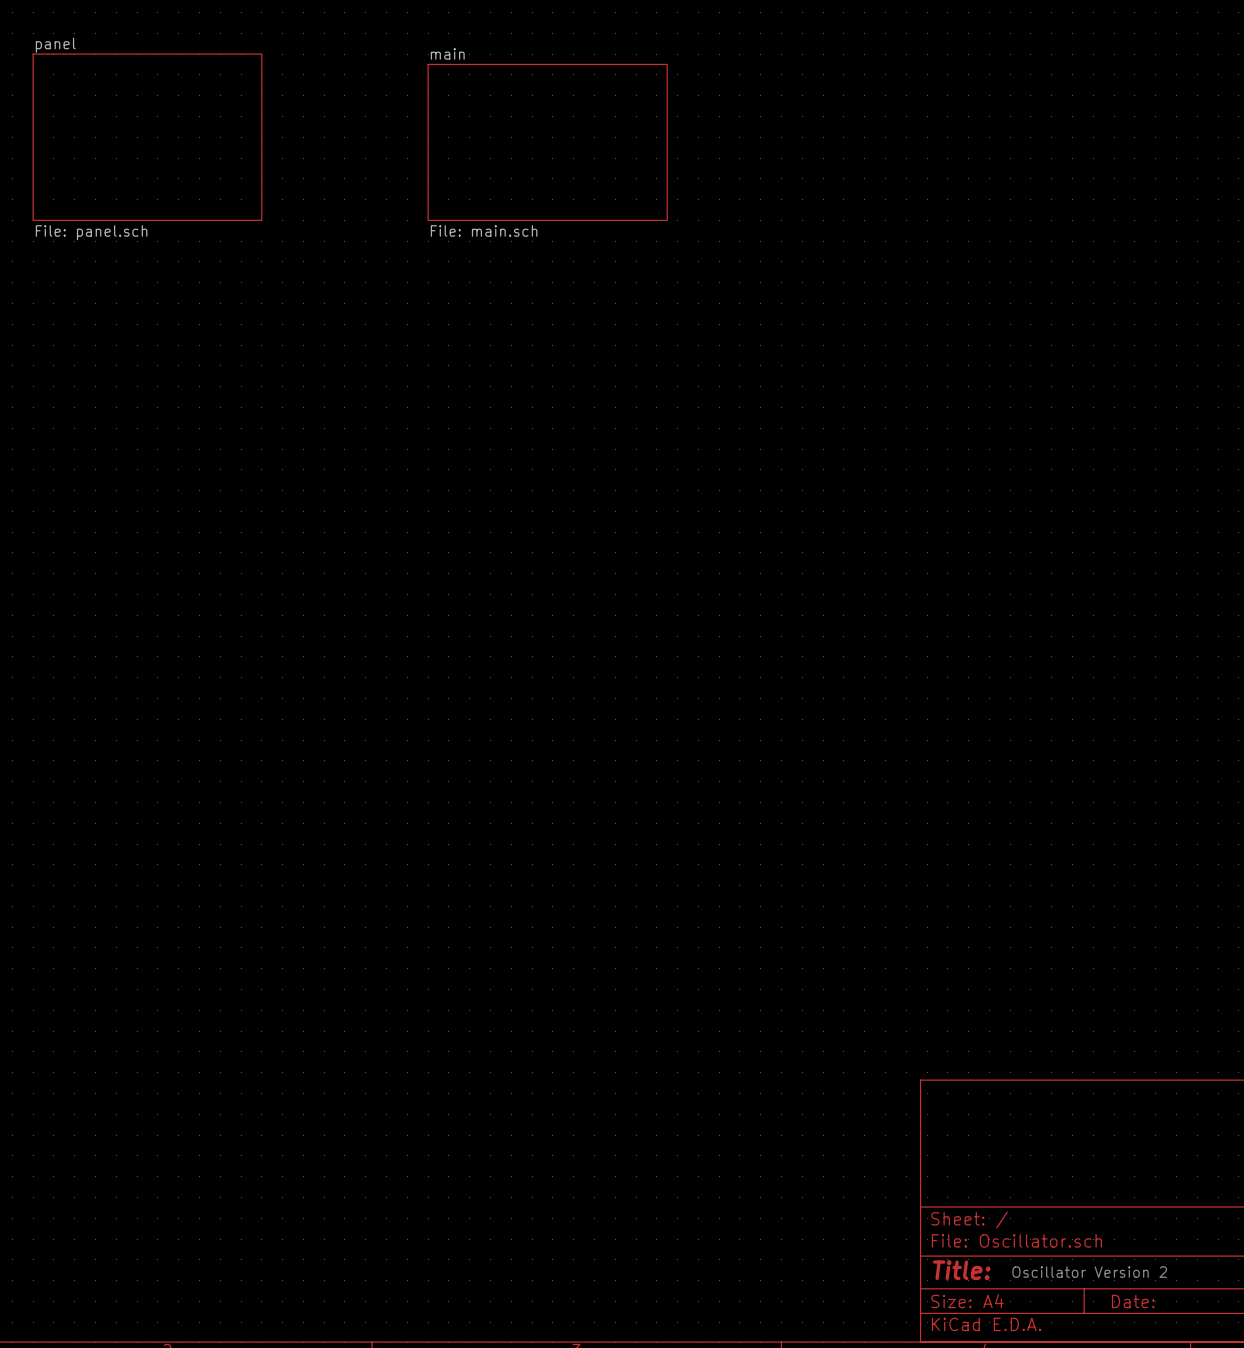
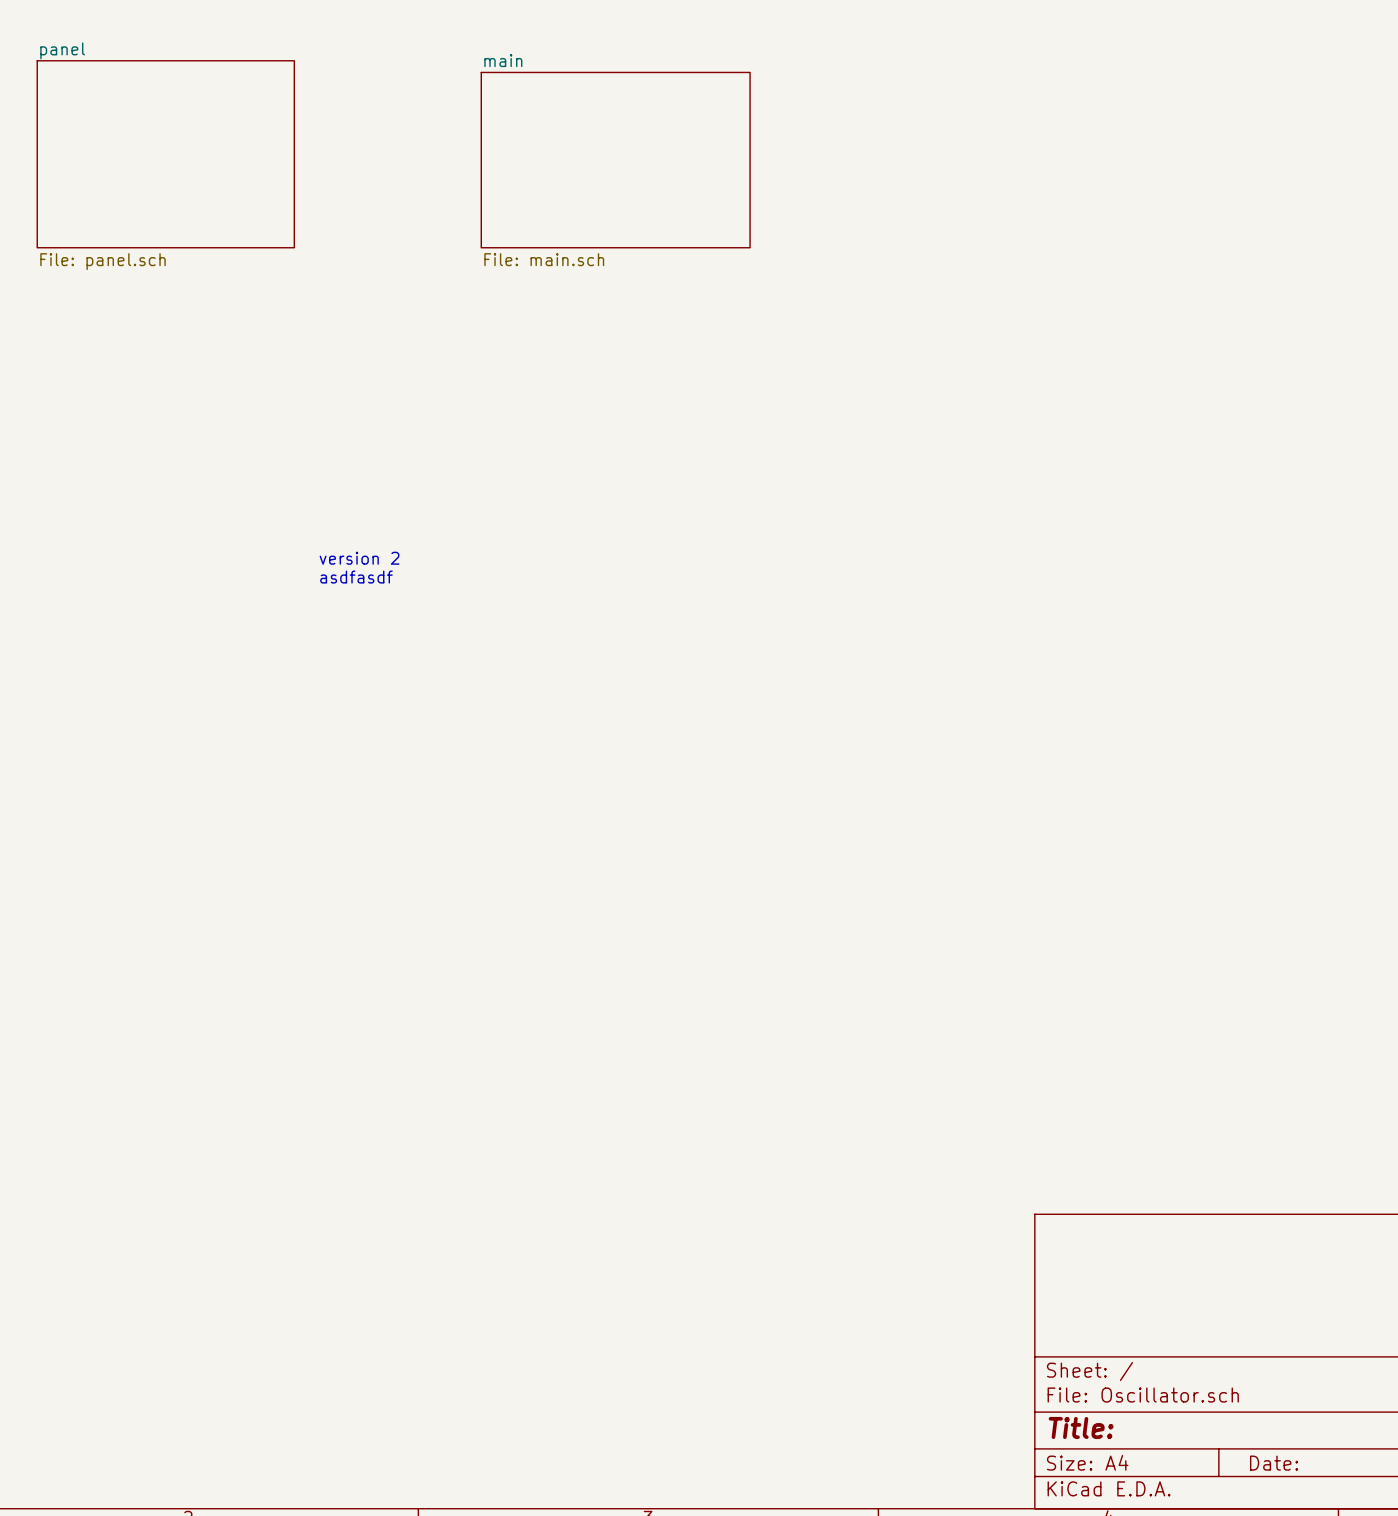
text: none -> version 2 (359, 558)
text: none -> asdfasdf (356, 577)
text: Oscillator Version 2 (1089, 1272) -> none

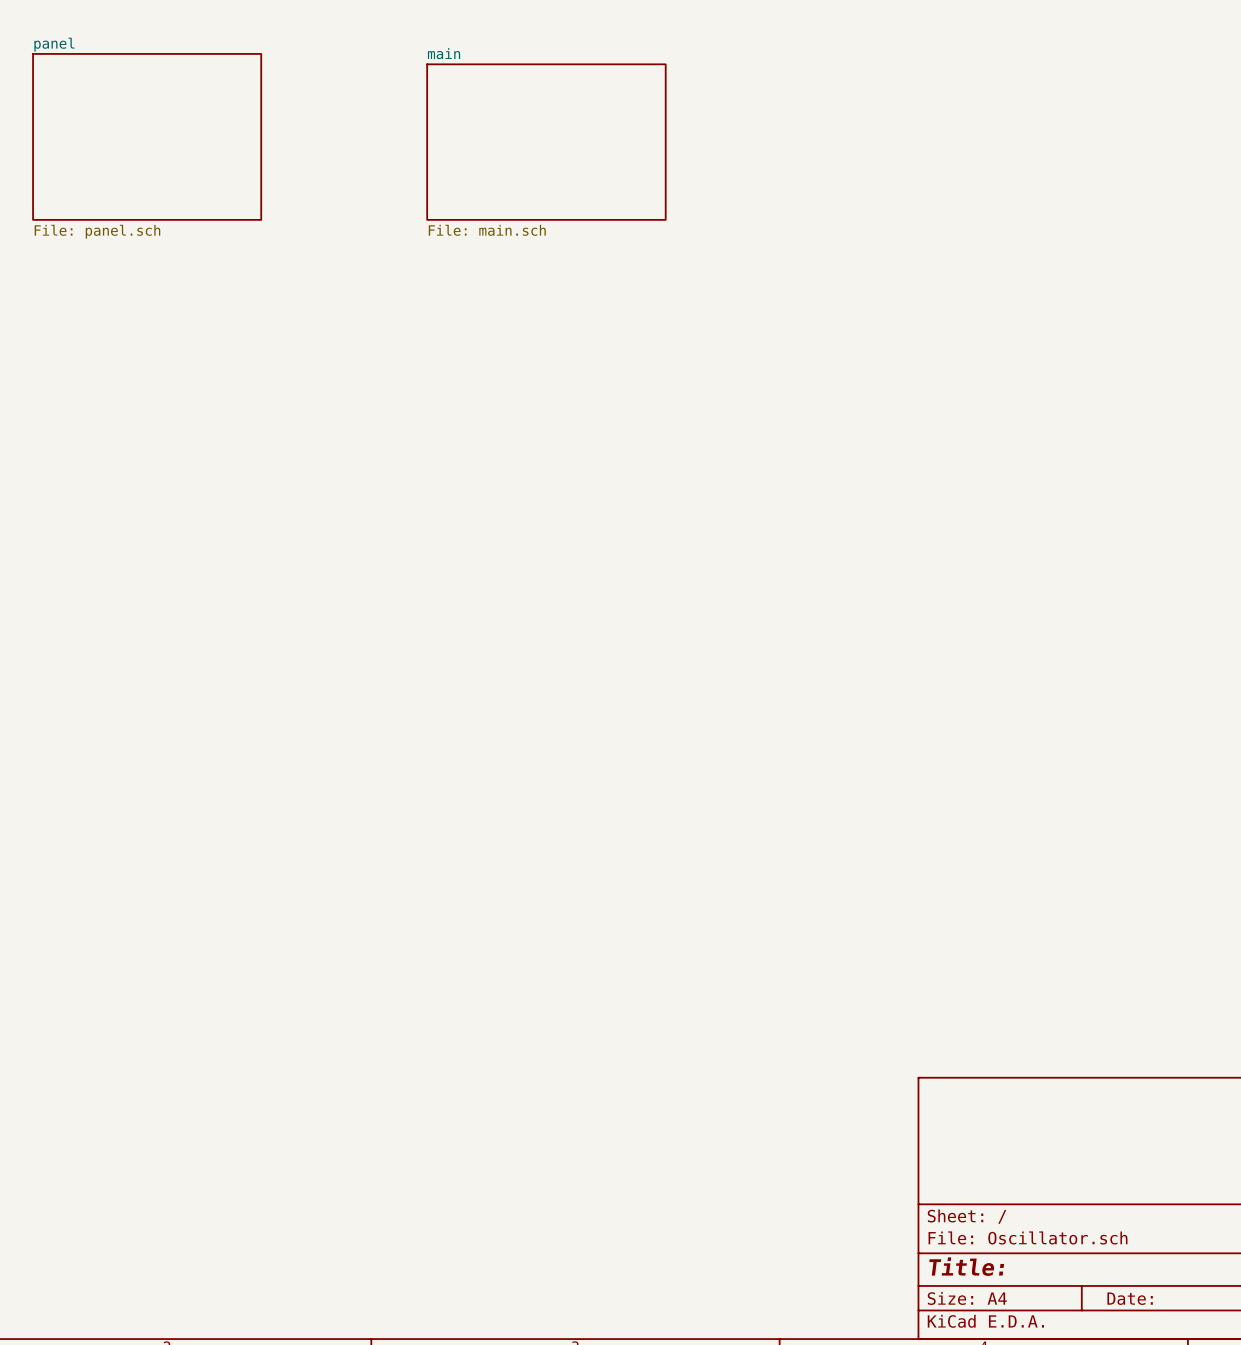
text: version 2 (359, 558) -> none
text: asdfasdf (356, 577) -> none

